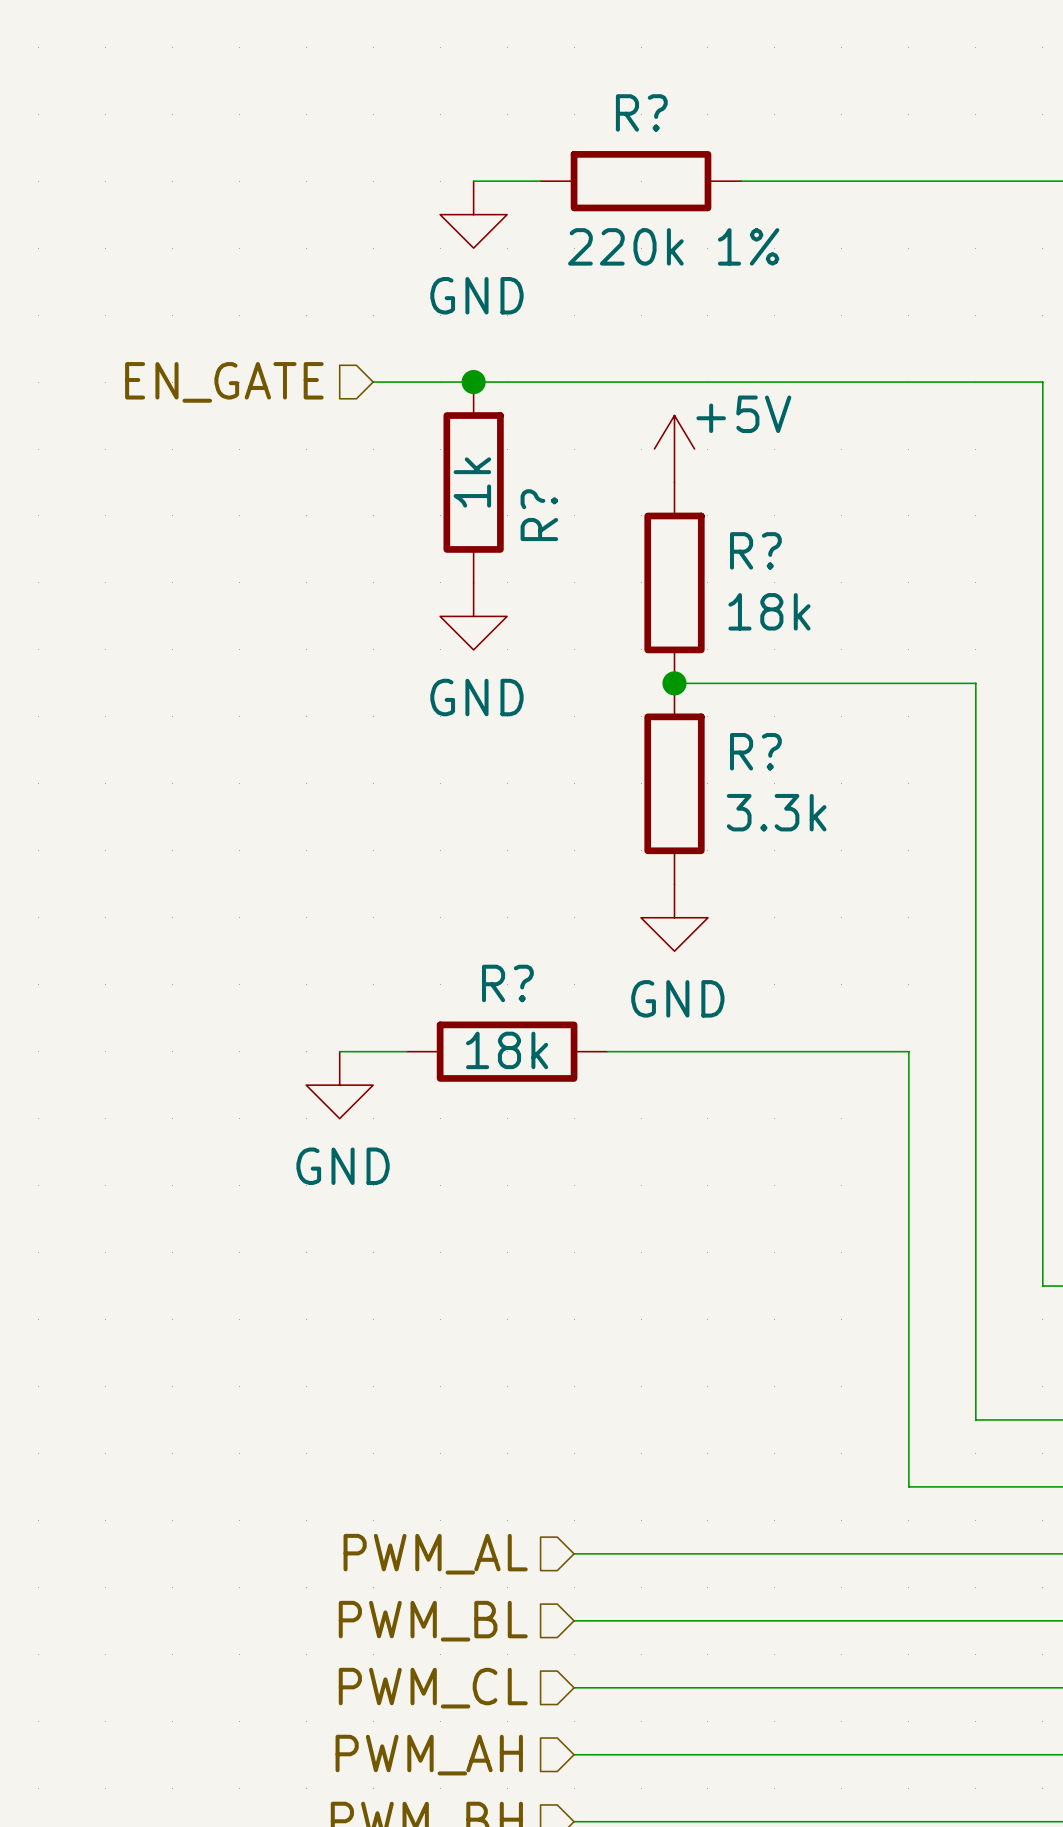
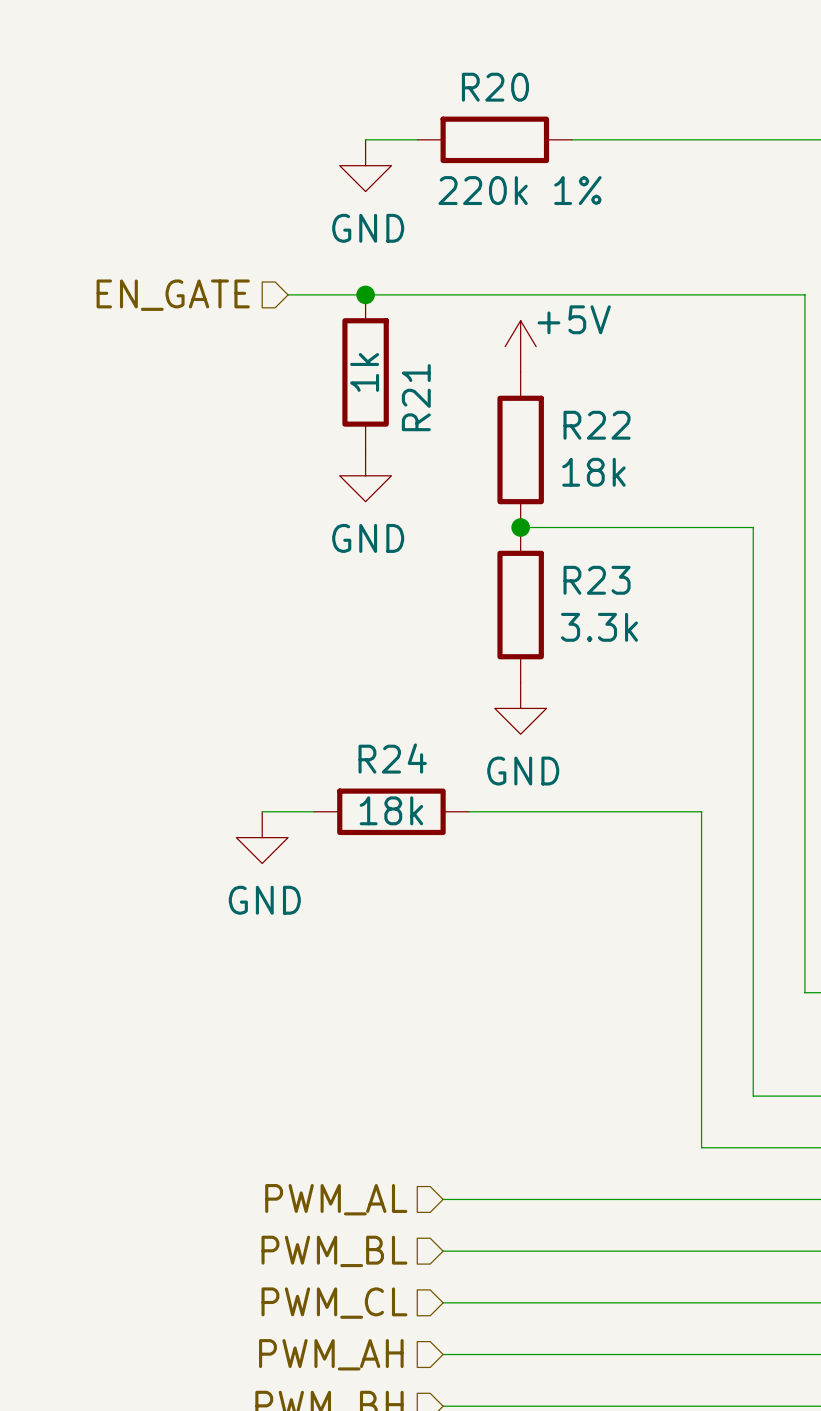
R? name: R? (641, 112) -> R20 (495, 87)
R? name: R? (539, 515) -> R21 (416, 397)
R? name: R? (755, 550) -> R22 (597, 425)
R? name: R? (755, 751) -> R23 (597, 580)
R? name: R? (507, 983) -> R24 (392, 758)

